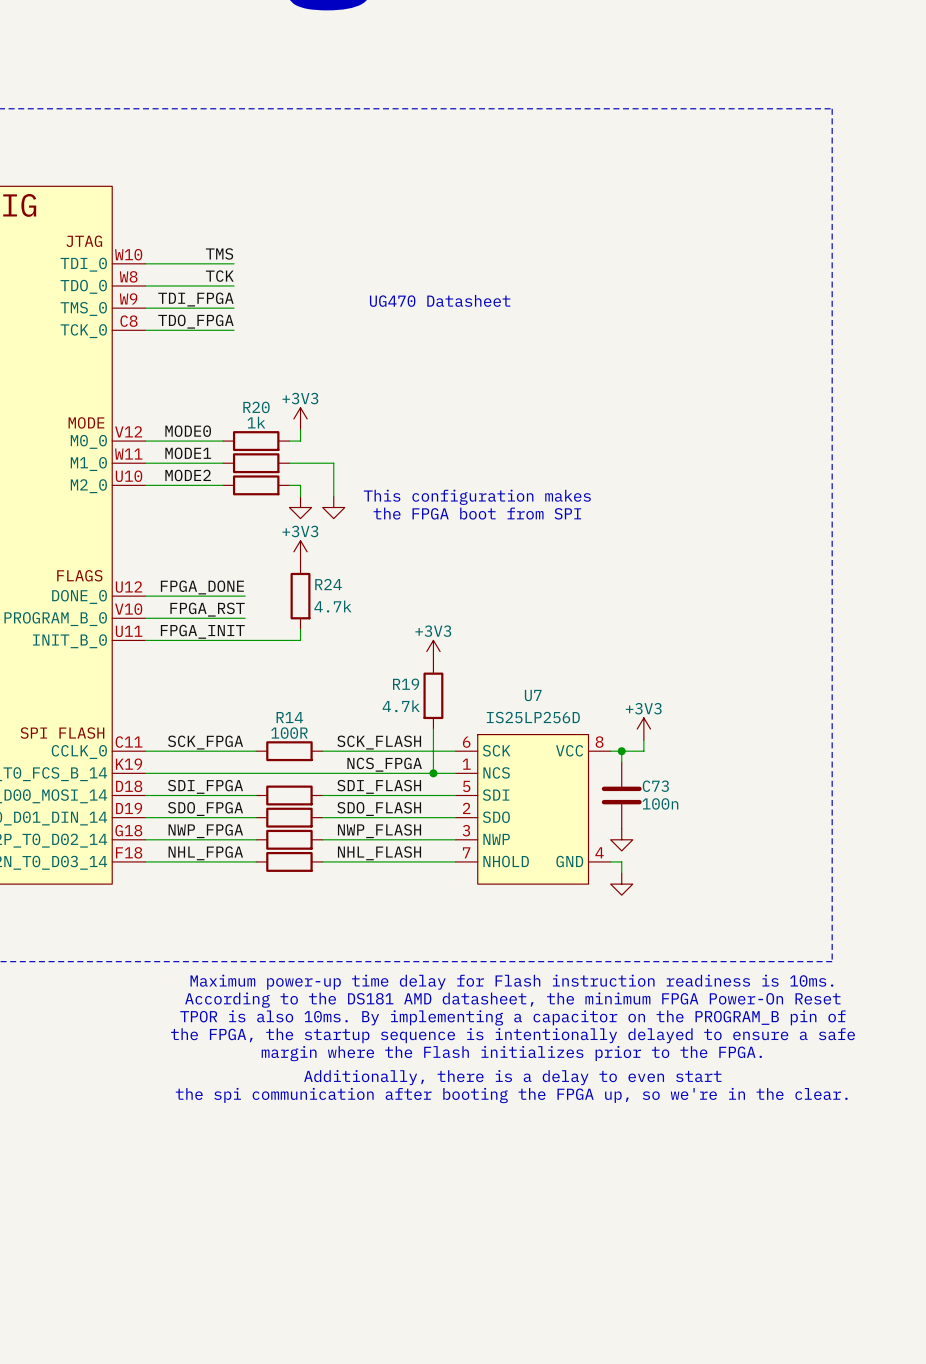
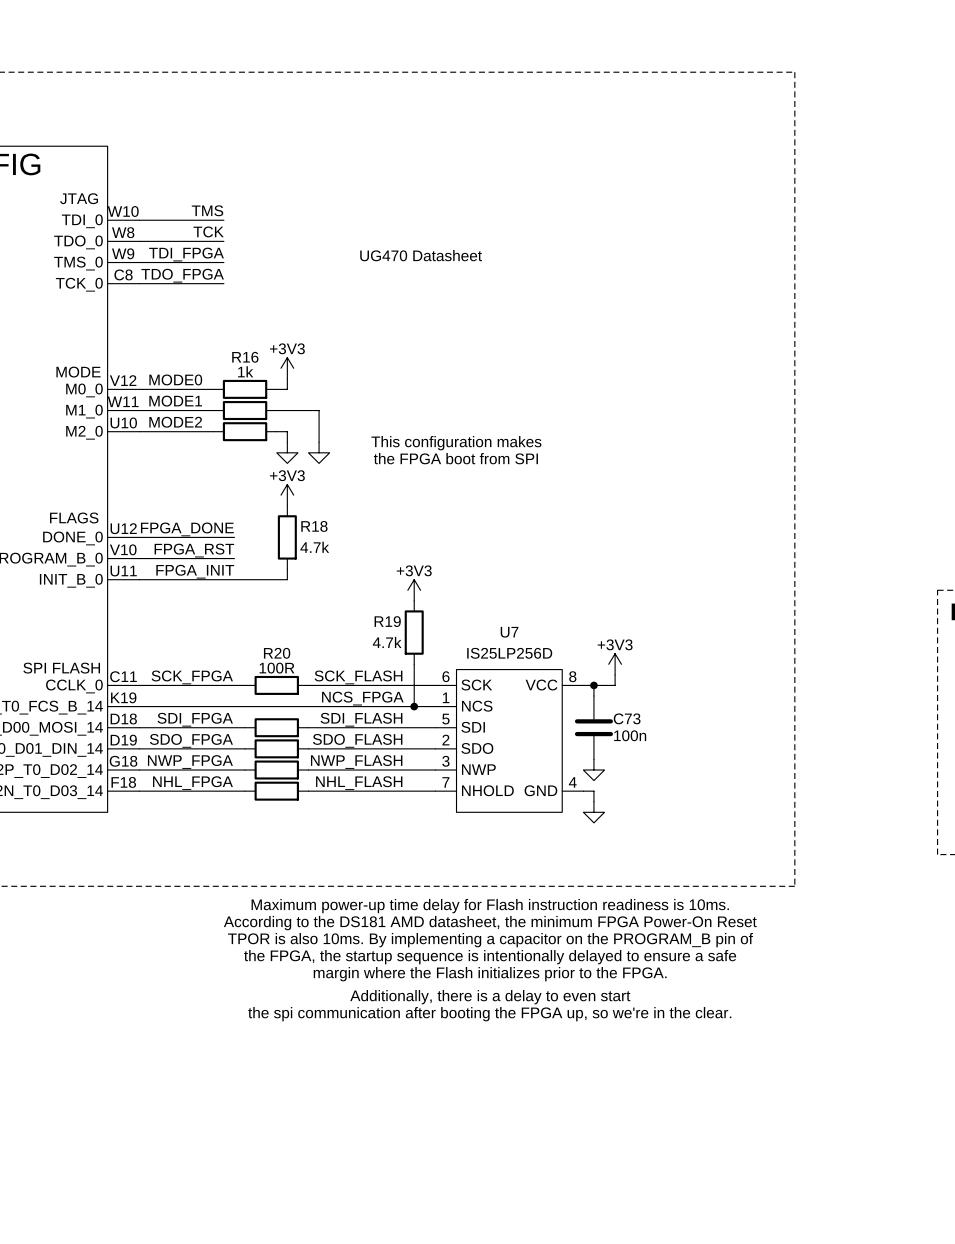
R20 name: R20 (256, 407) -> R16 (245, 357)
R24 name: R24 (328, 584) -> R18 (314, 526)
R14 name: R14 (289, 717) -> R20 (277, 653)

